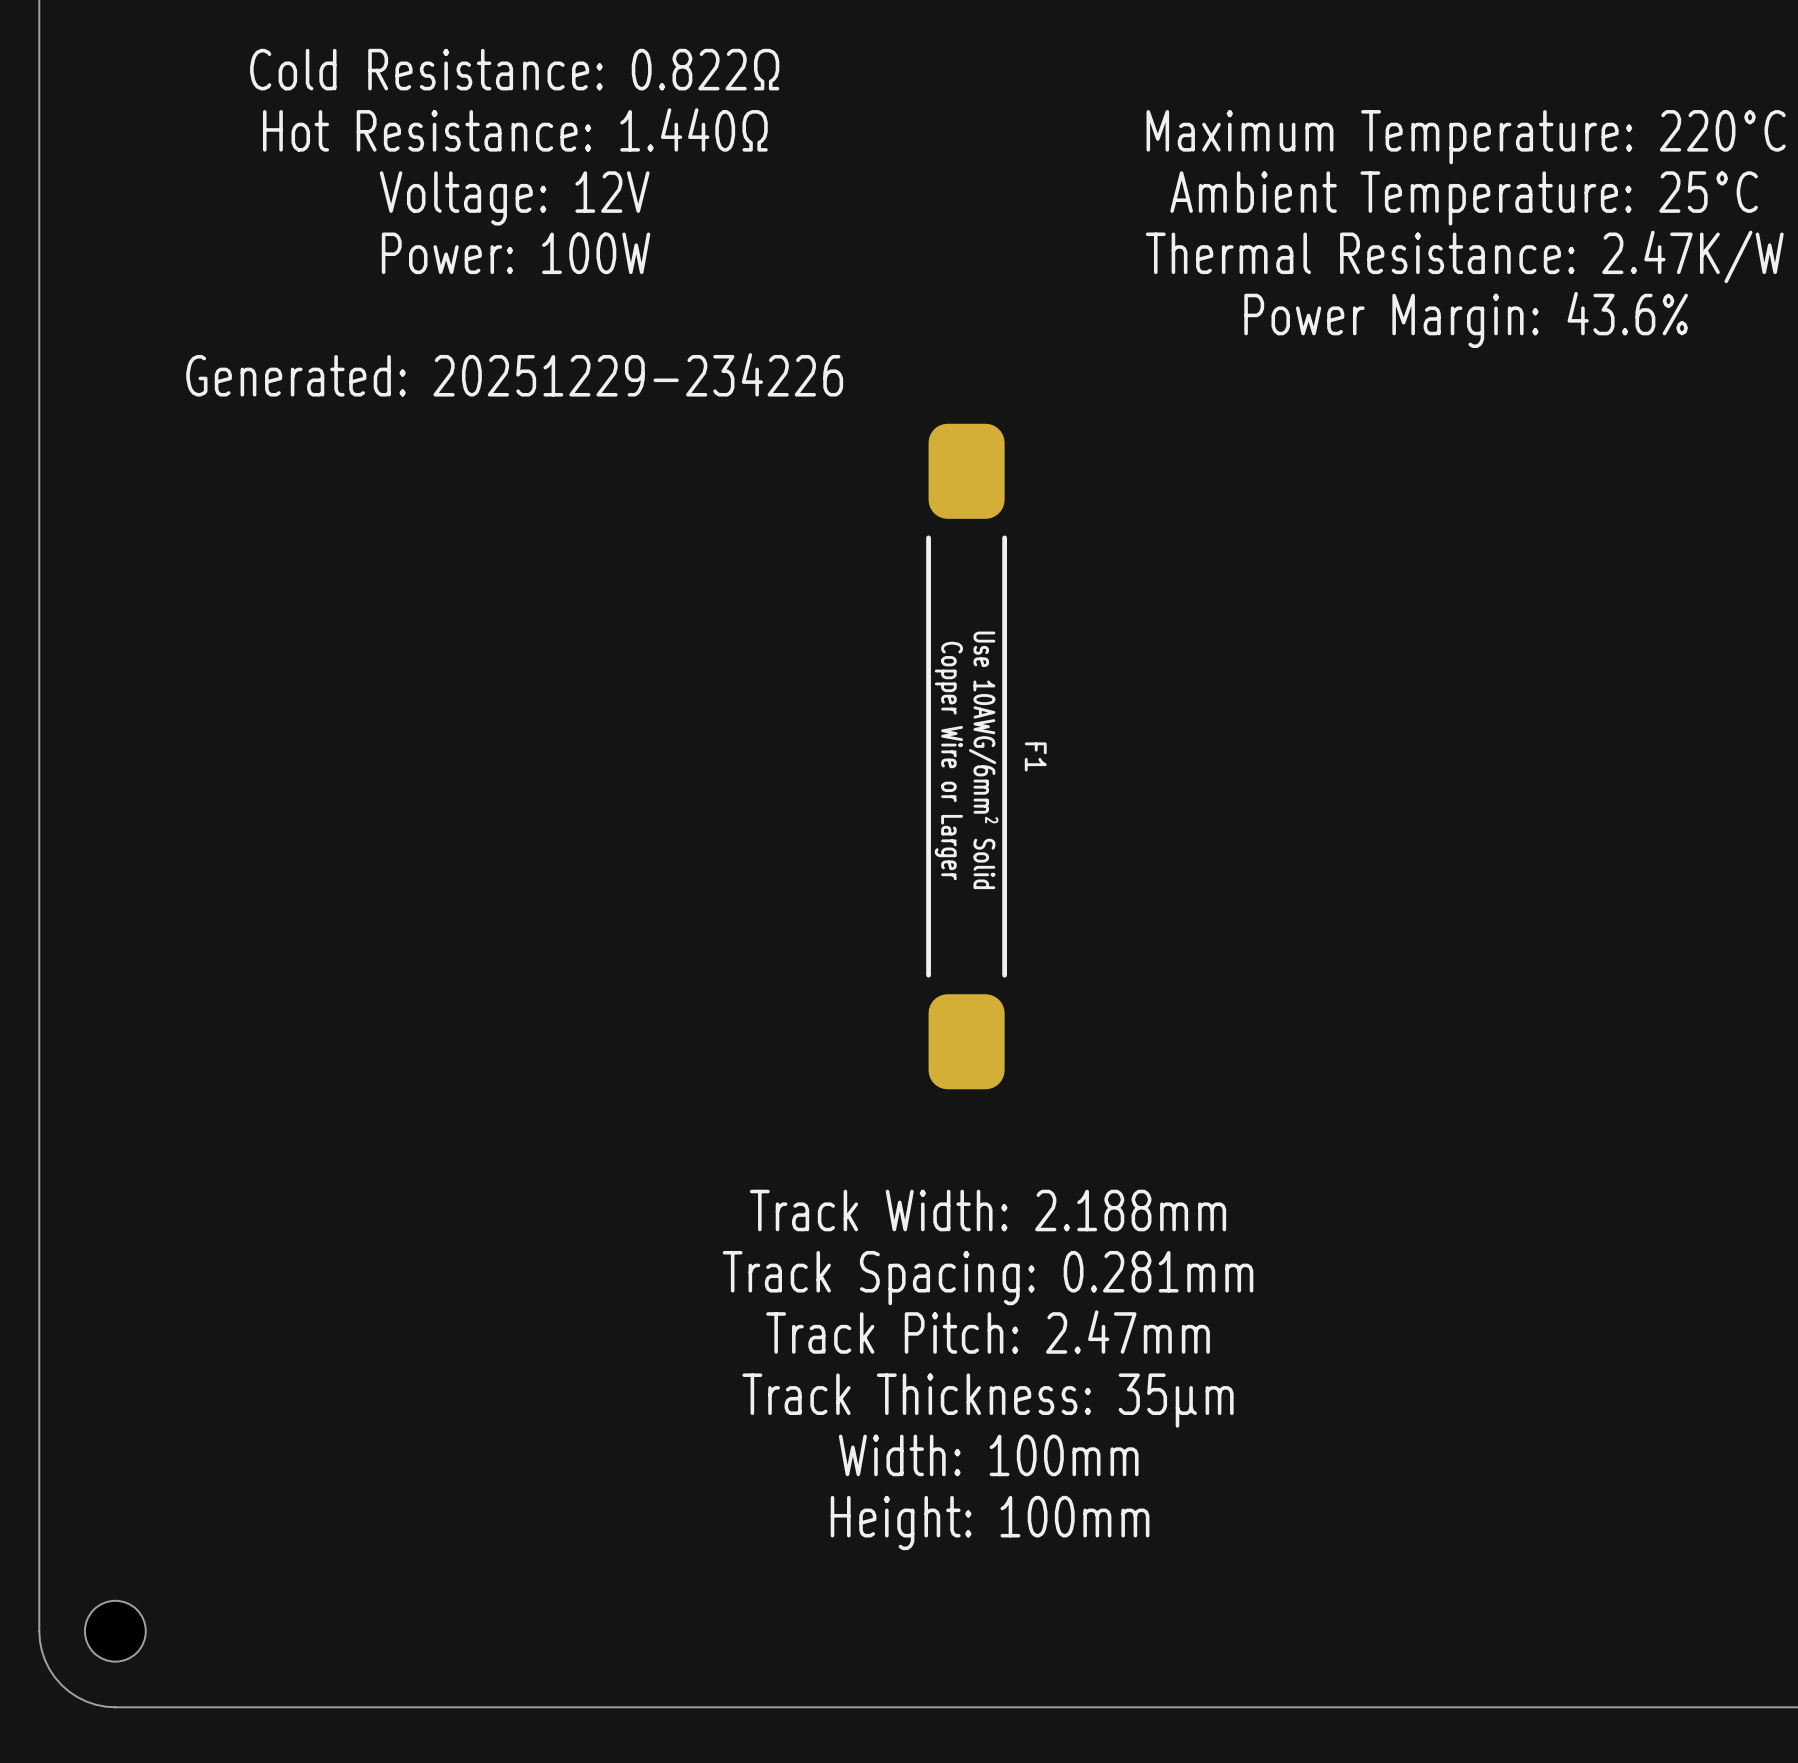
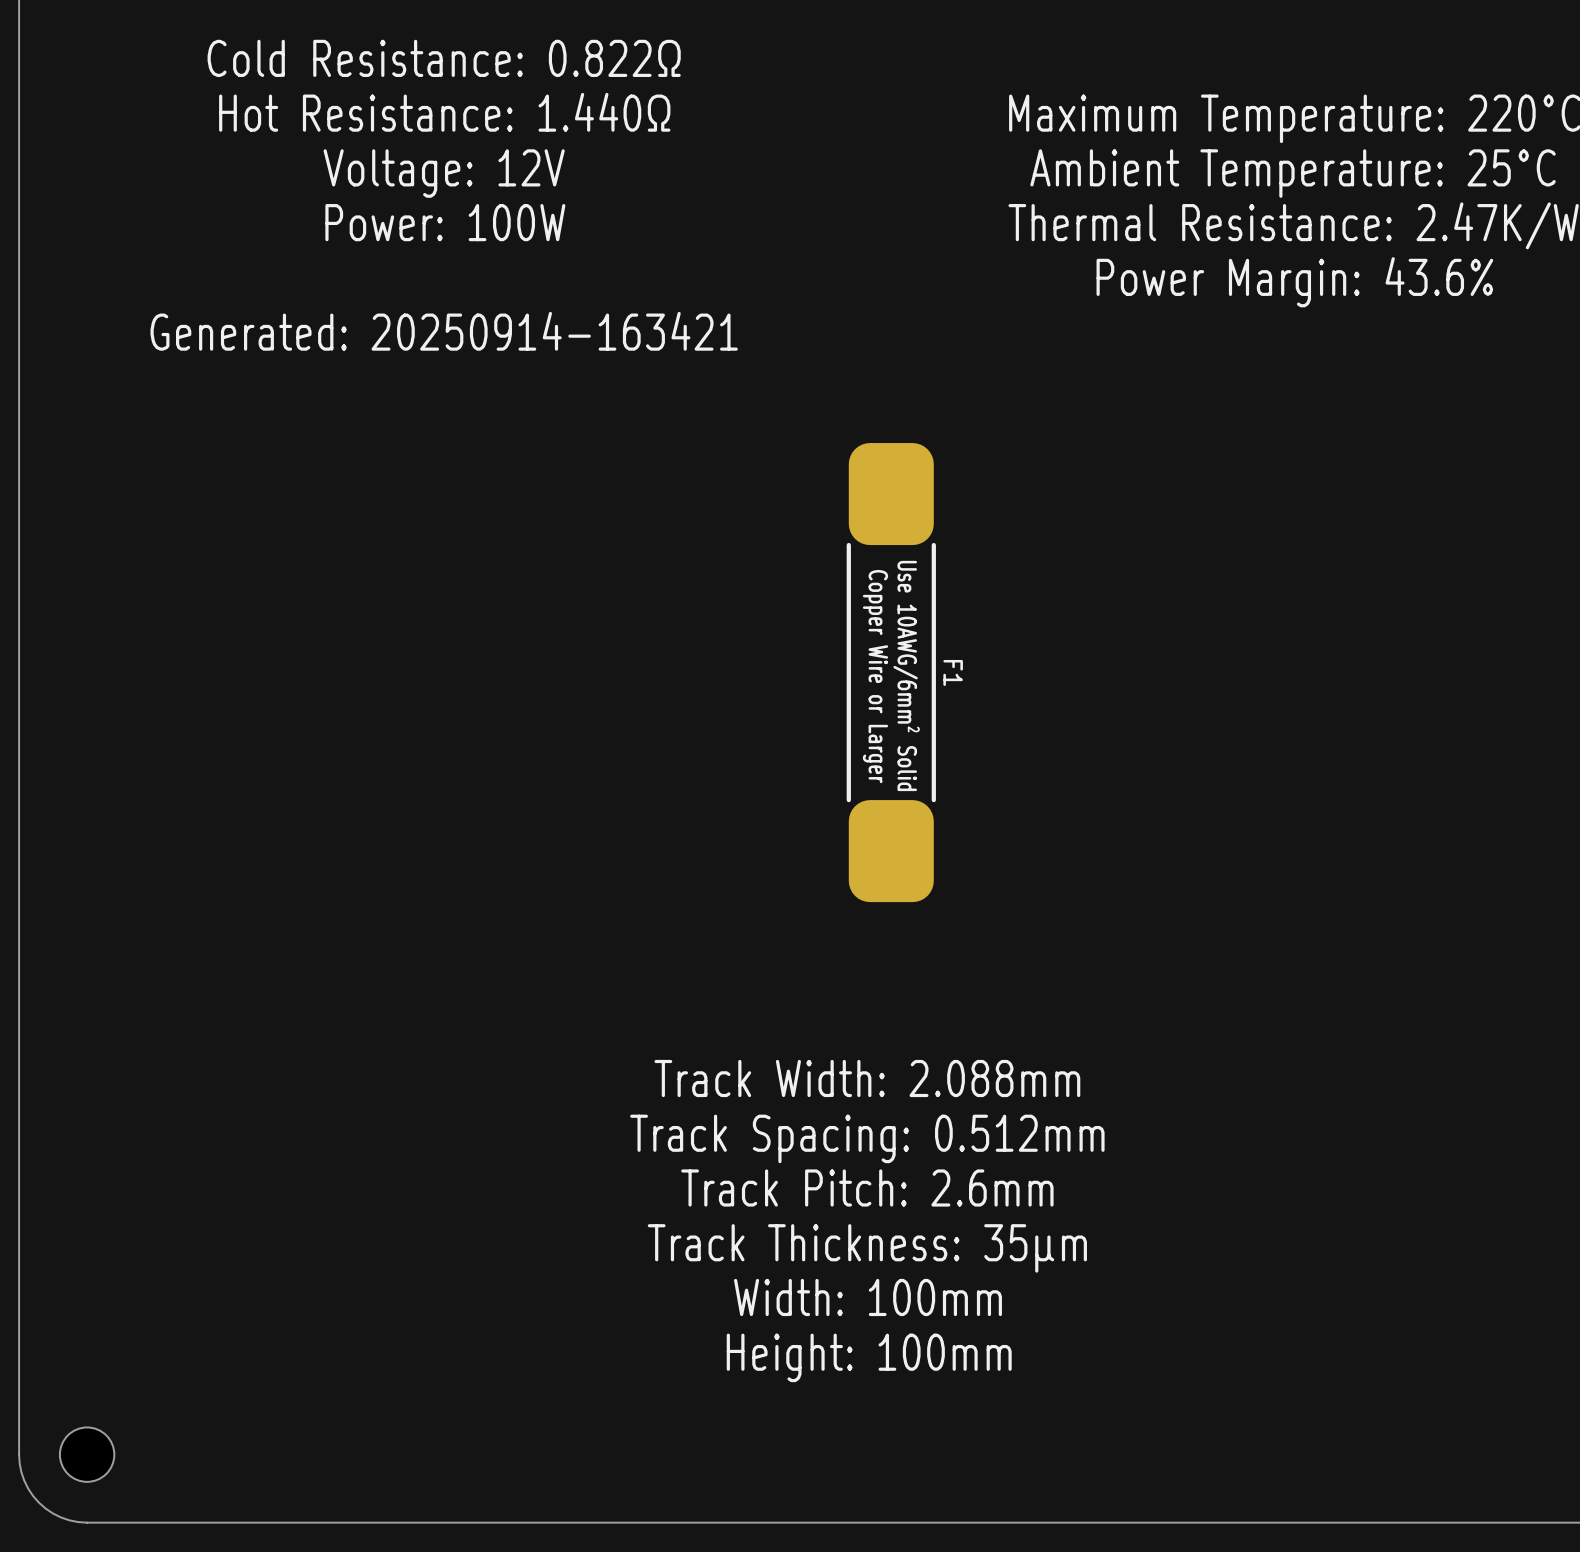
text: Generated: 20251229-234226 (514, 374) -> Generated: 20250914-163421 (444, 331)
F1 footprint: [926, 423, 1008, 1090] -> [846, 443, 936, 903]
text: Track Width: 2.188mm (988, 1210) -> Track Width: 2.088mm (867, 1078)
text: Track Spacing: 0.281mm (988, 1278) -> Track Spacing: 0.512mm (867, 1138)
text: Track Pitch: 2.47mm (988, 1332) -> Track Pitch: 2.6mm (867, 1187)

